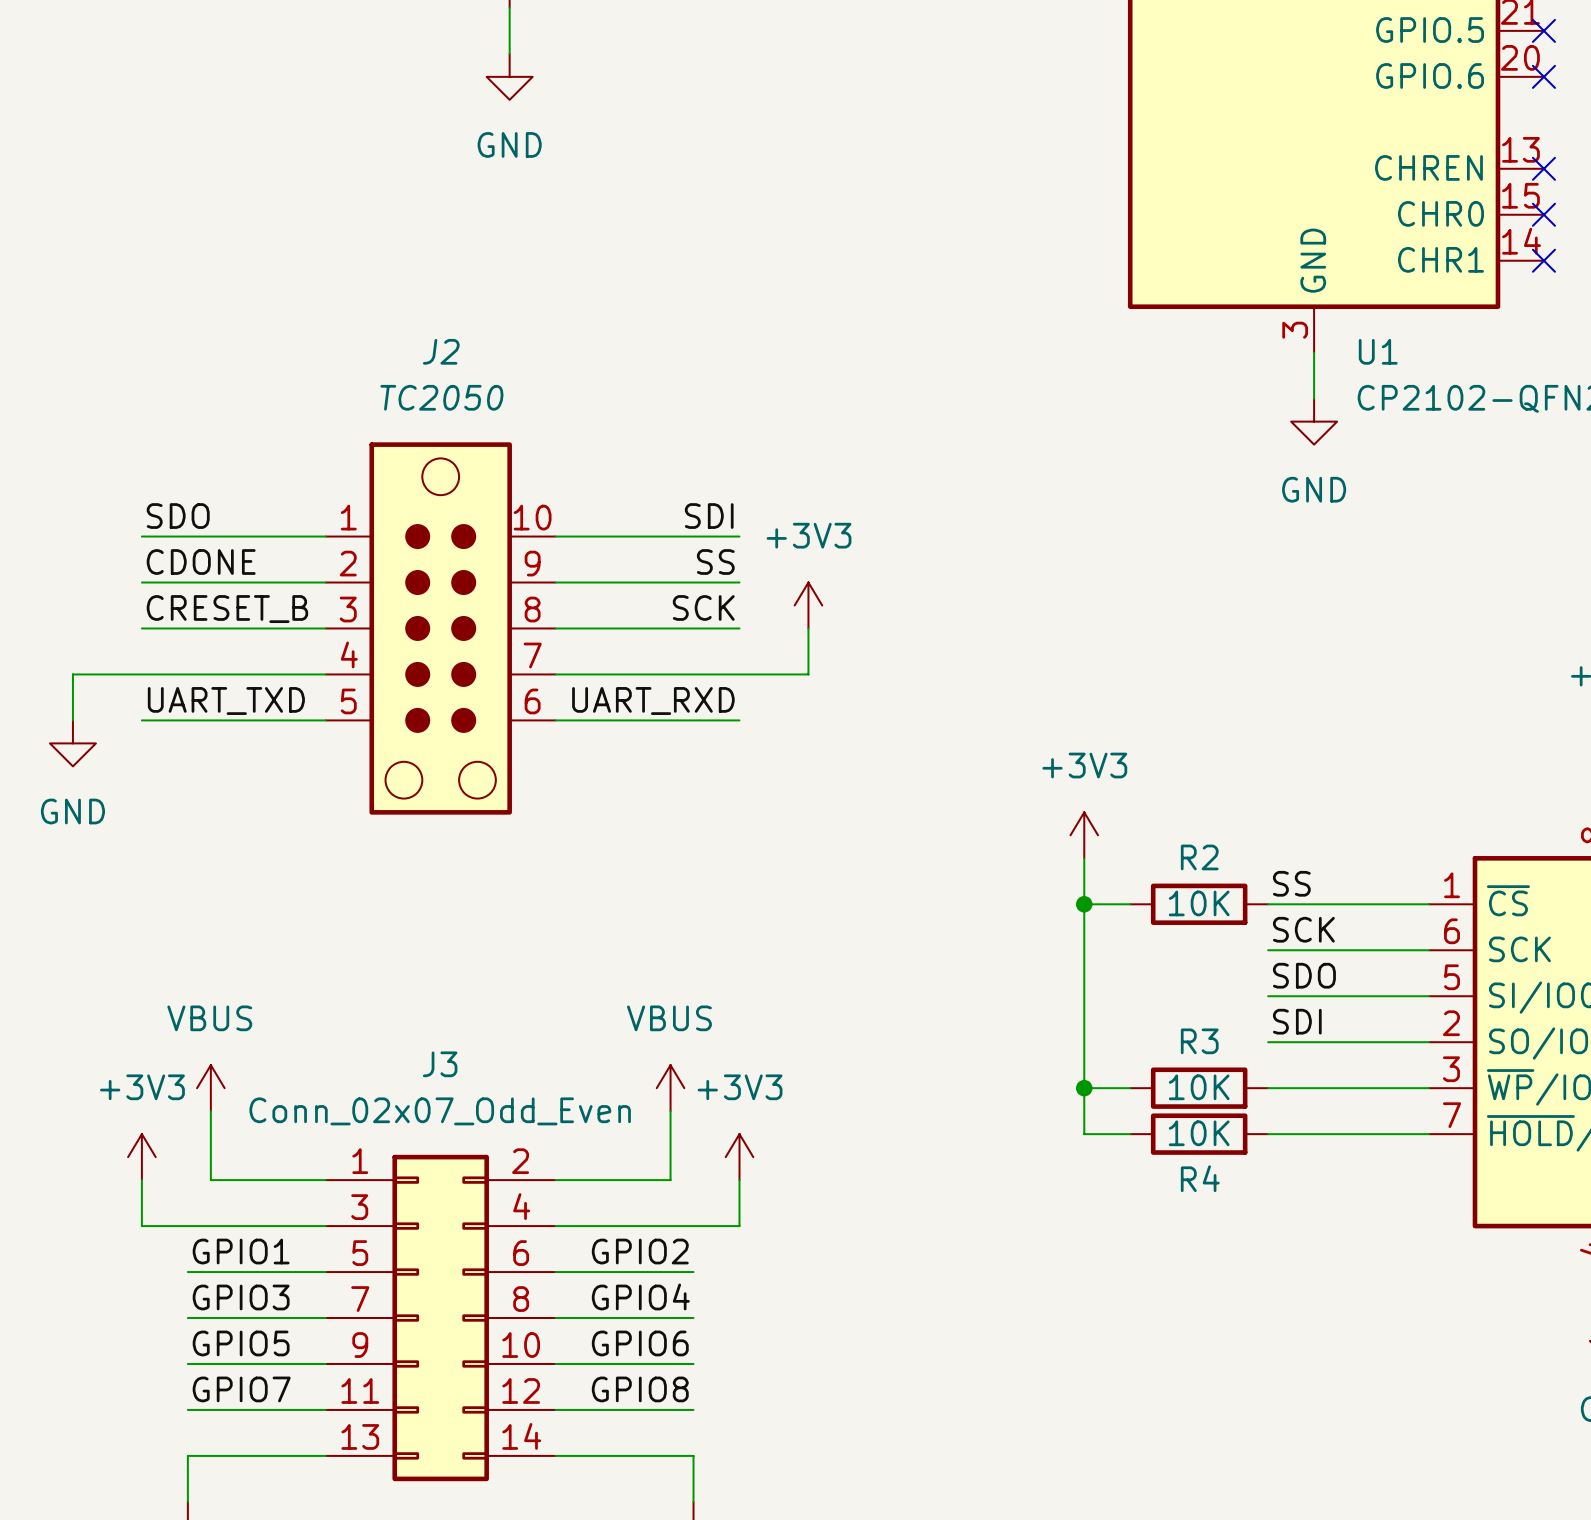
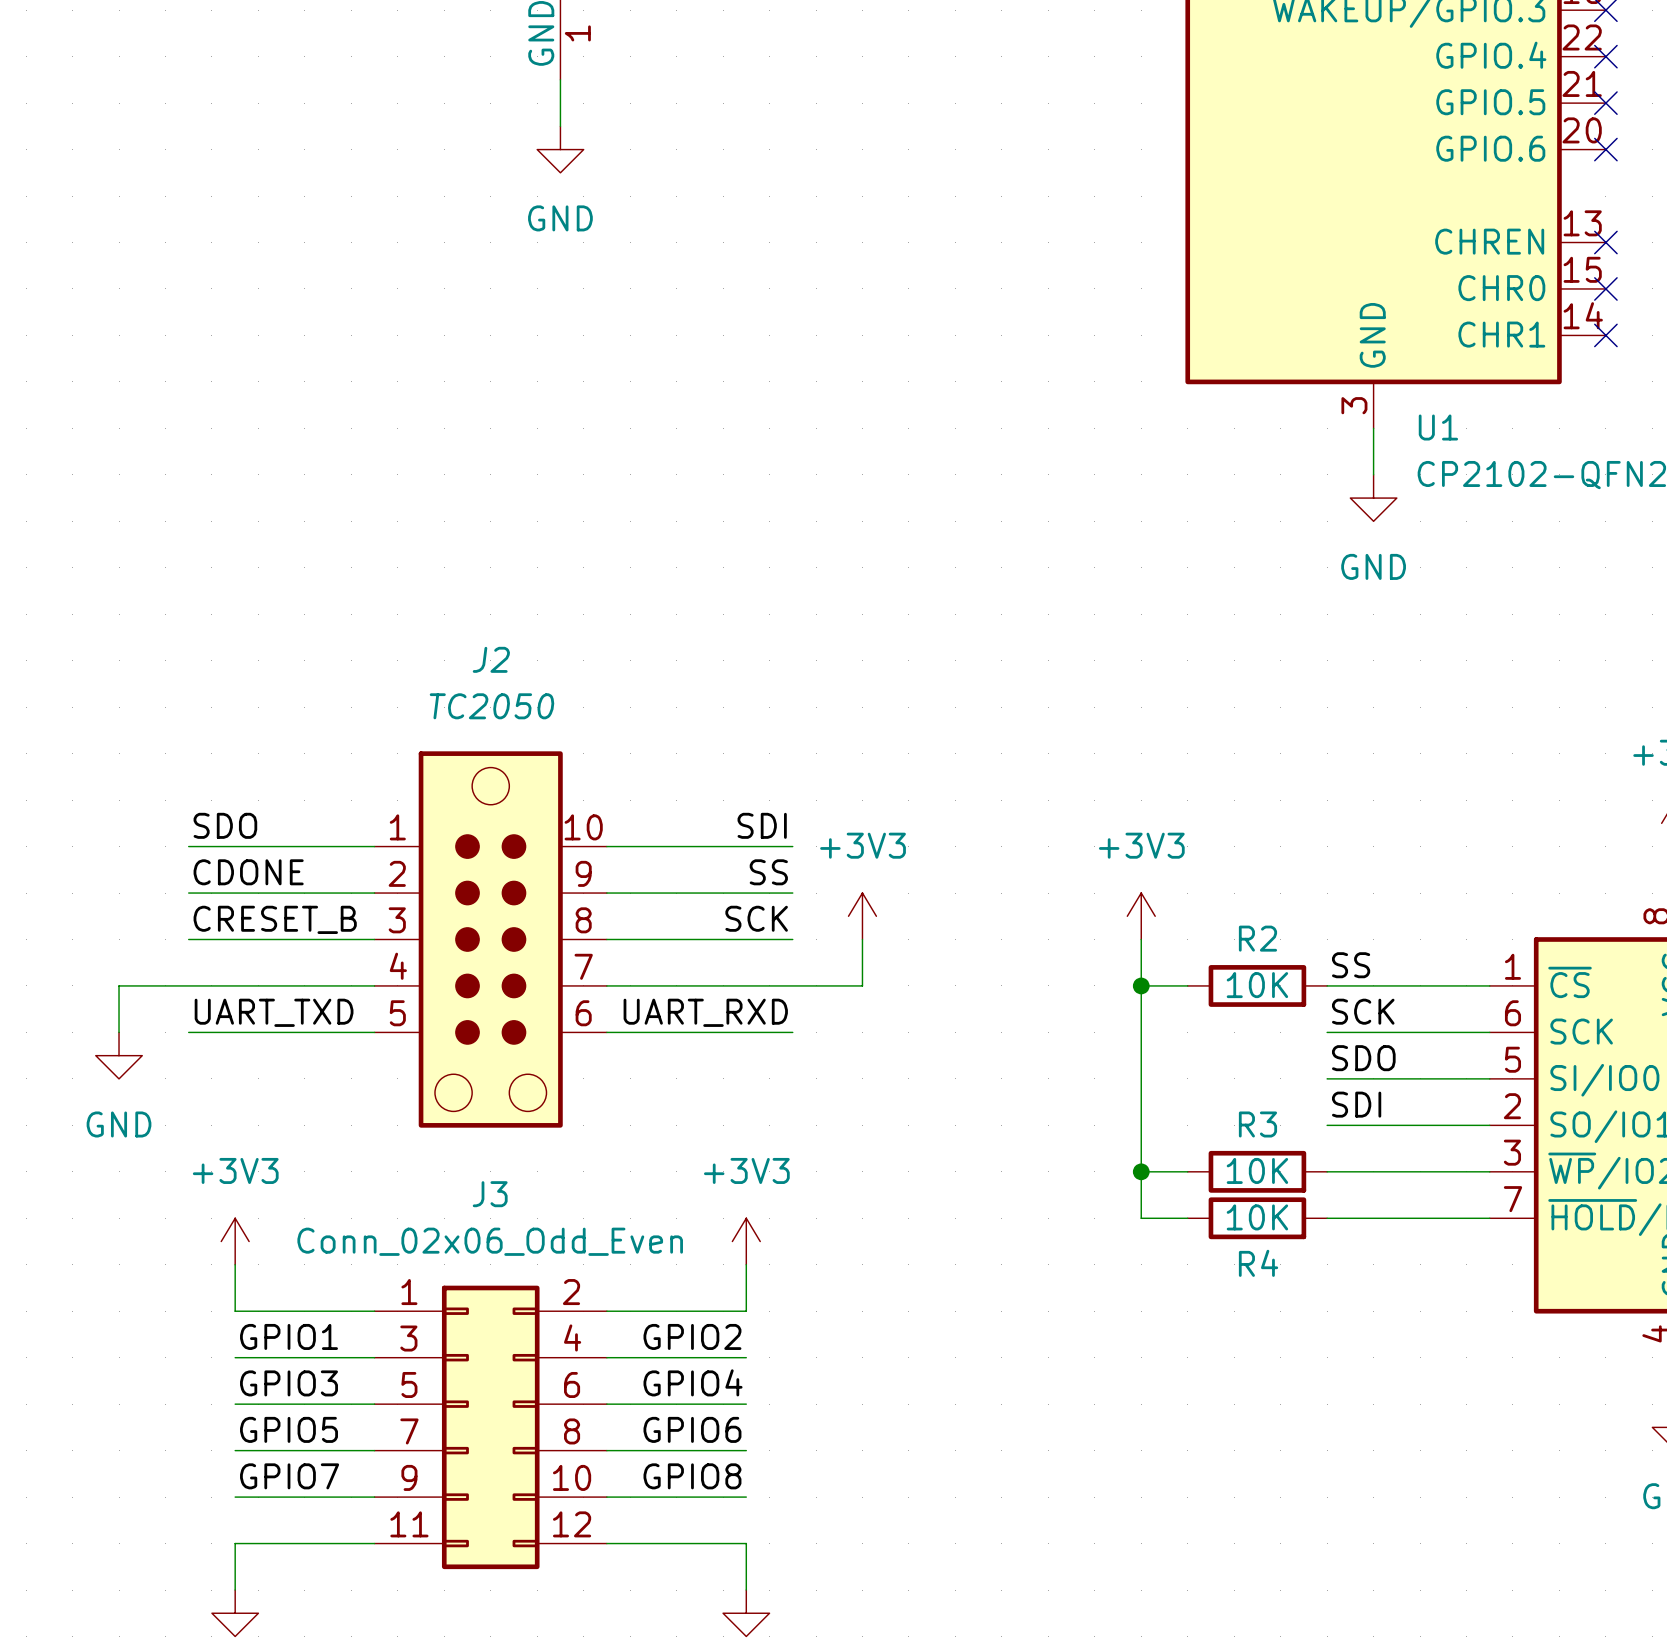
label position: SDO (178, 516) -> SDO (225, 825)
label position: SDI (709, 516) -> SDI (762, 825)
wire: (141, 536) (325, 536) -> (188, 846) (374, 846)
wire: (555, 536) (739, 536) -> (606, 846) (792, 846)
label position: CDONE (201, 562) -> CDONE (248, 872)
label position: SS (715, 562) -> SS (768, 872)
wire: (141, 582) (325, 582) -> (188, 893) (374, 893)
wire: (555, 582) (739, 582) -> (606, 893) (792, 893)
power symbol: +3V3 (808, 605) -> none
label position: SCK (703, 607) -> SCK (756, 918)
label position: CRESET_B (227, 609) -> CRESET_B (275, 919)
wire: (141, 628) (325, 628) -> (188, 939) (374, 939)
J2 position: (440, 628) -> (490, 939)
wire: (555, 628) (739, 628) -> (606, 939) (792, 939)
wire: (808, 628) (808, 674) (555, 674) -> (862, 939) (862, 985) (606, 985)
wire: (325, 674) (72, 674) (72, 720) -> (374, 985) (119, 985) (119, 1032)
label position: UART_TXD (226, 701) -> UART_TXD (274, 1012)
label position: UART_RXD (653, 701) -> UART_RXD (705, 1012)
wire: (141, 720) (325, 720) -> (188, 1032) (374, 1032)
wire: (555, 720) (739, 720) -> (606, 1032) (792, 1032)
power symbol position: GND (72, 743) -> GND (119, 1055)
power symbol: none -> +3V3 (862, 916)
power symbol: VBUS (210, 1088) -> none
power symbol: VBUS (670, 1088) -> none
wire: (210, 1111) (210, 1180) (325, 1180) -> none
J3 value: Conn_02x07_Odd_Even (440, 1111) -> Conn_02x06_Odd_Even (490, 1241)
wire: (670, 1111) (670, 1180) (555, 1180) -> none
J3 symbol: [325, 1154, 556, 1482] -> [374, 1285, 607, 1570]
power symbol position: +3V3 (141, 1157) -> +3V3 (235, 1241)
power symbol position: +3V3 (739, 1157) -> +3V3 (746, 1241)
wire: (141, 1180) (141, 1226) (187, 1226) -> (235, 1264) (235, 1311)
wire: (739, 1180) (739, 1226) (693, 1226) -> (746, 1264) (746, 1311)

